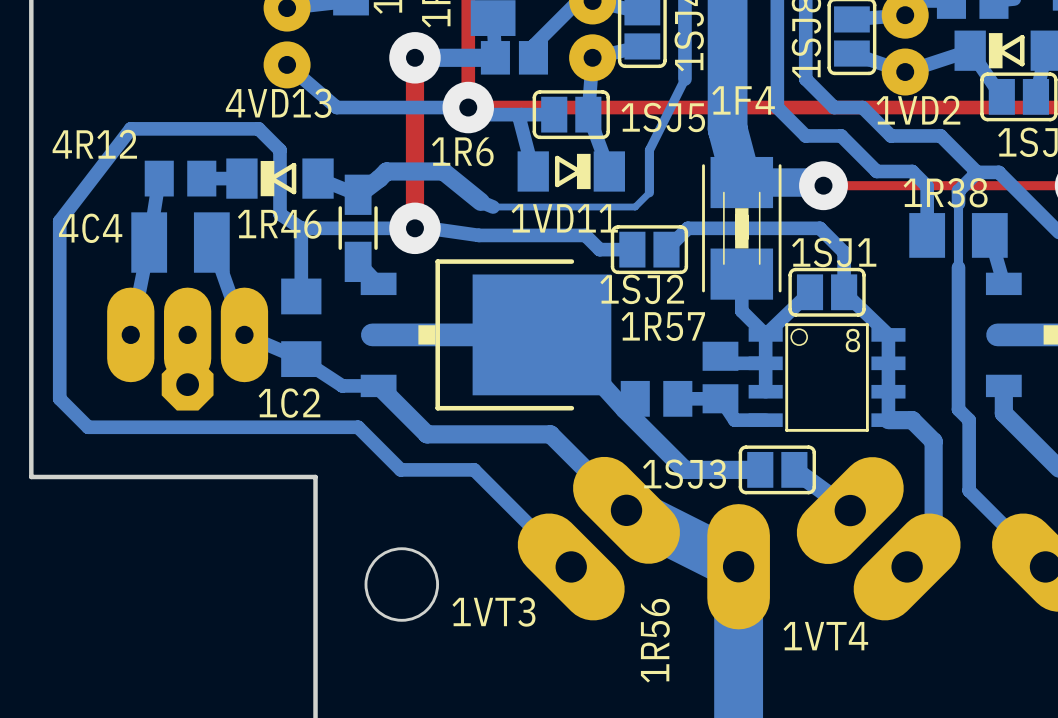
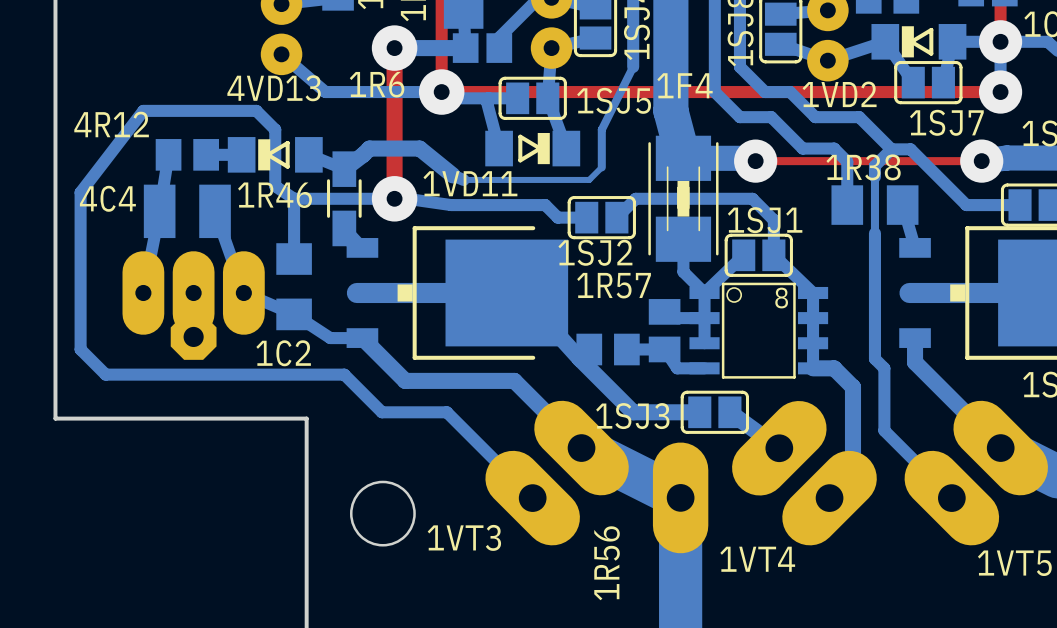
1R6 name position: 1R6 (462, 151) -> 1R6 (377, 84)
1VD11 name position: 1VD11 (564, 218) -> 1VD11 (470, 183)

